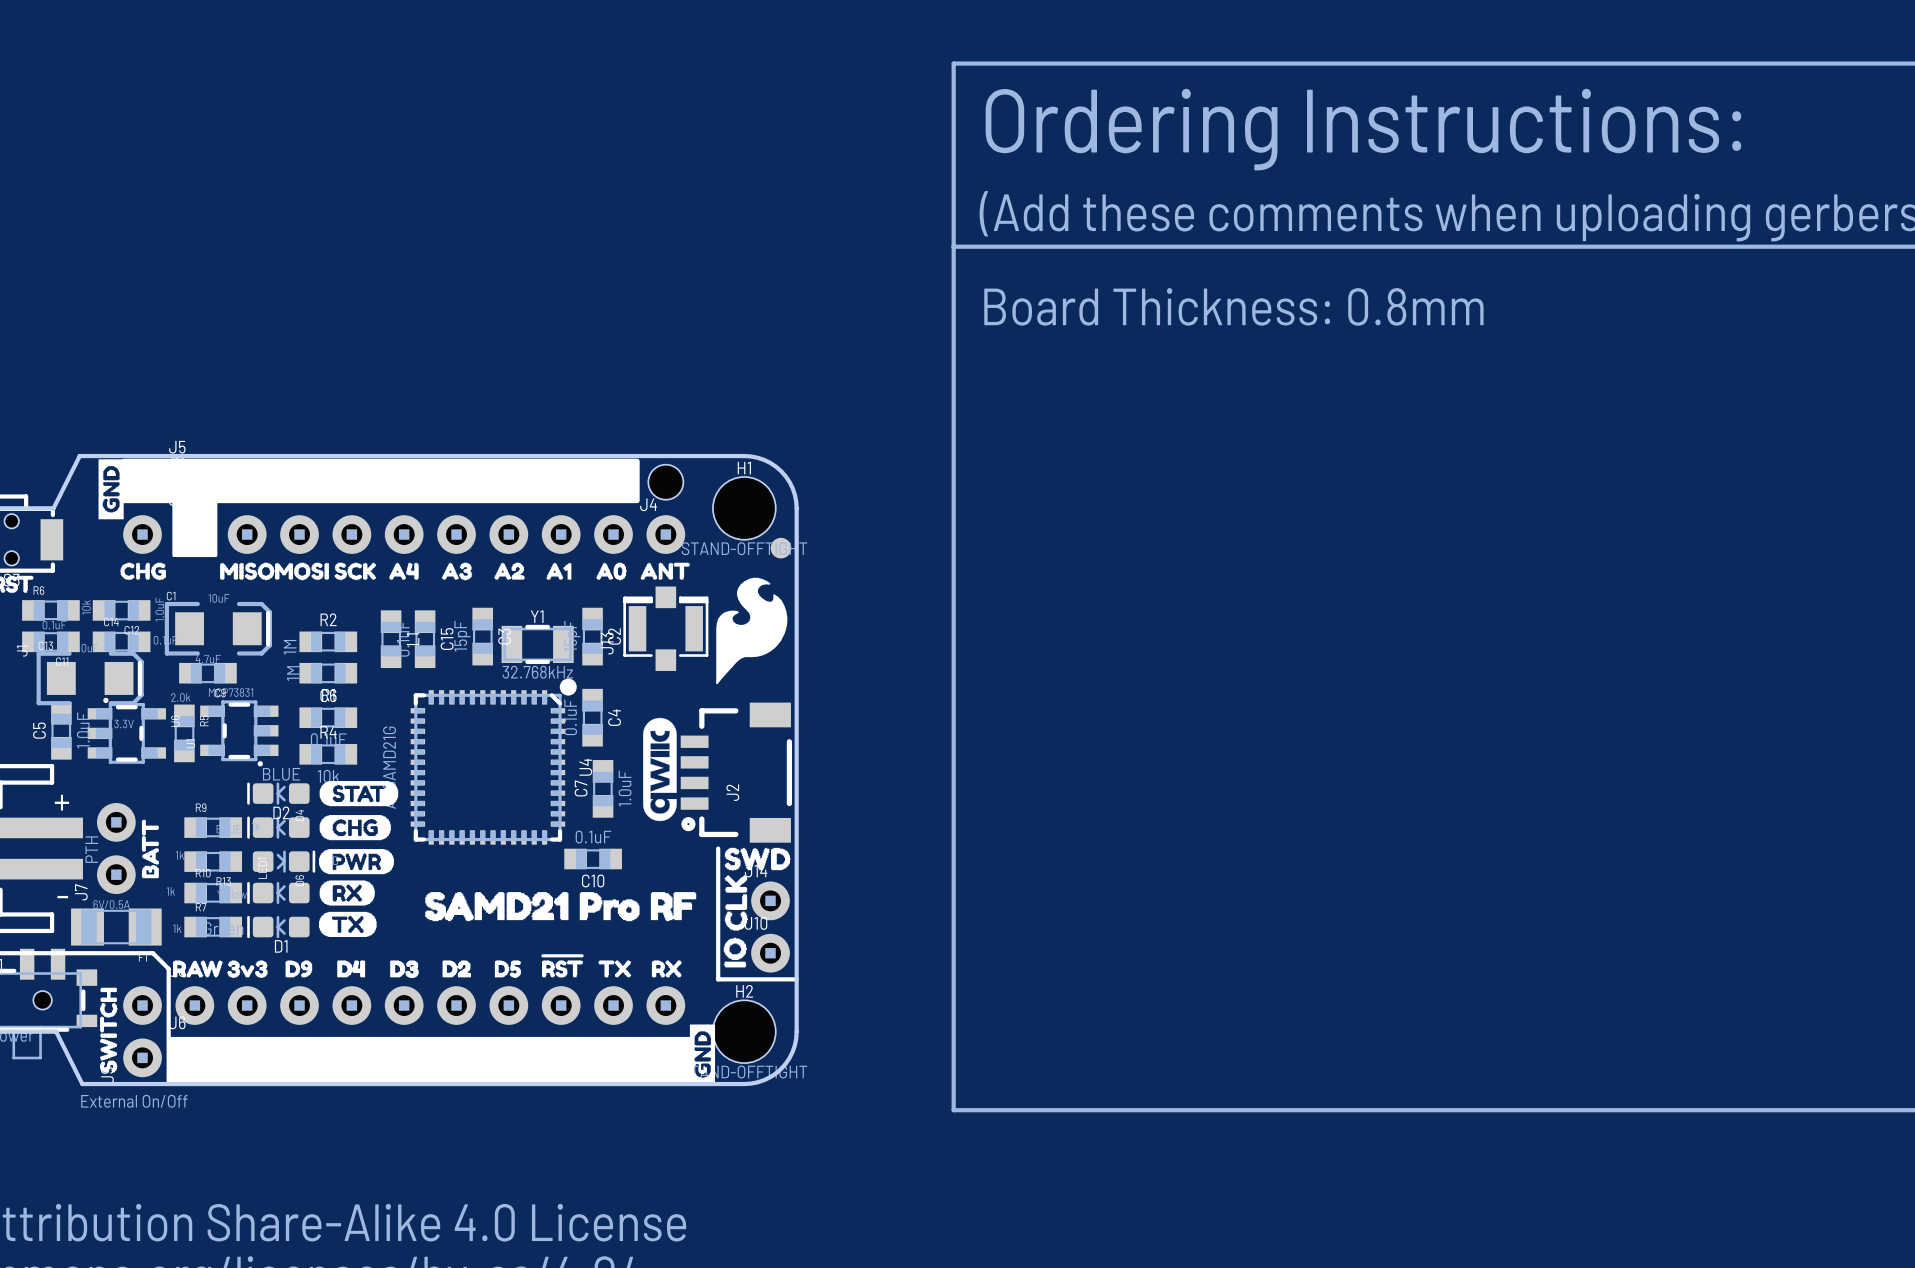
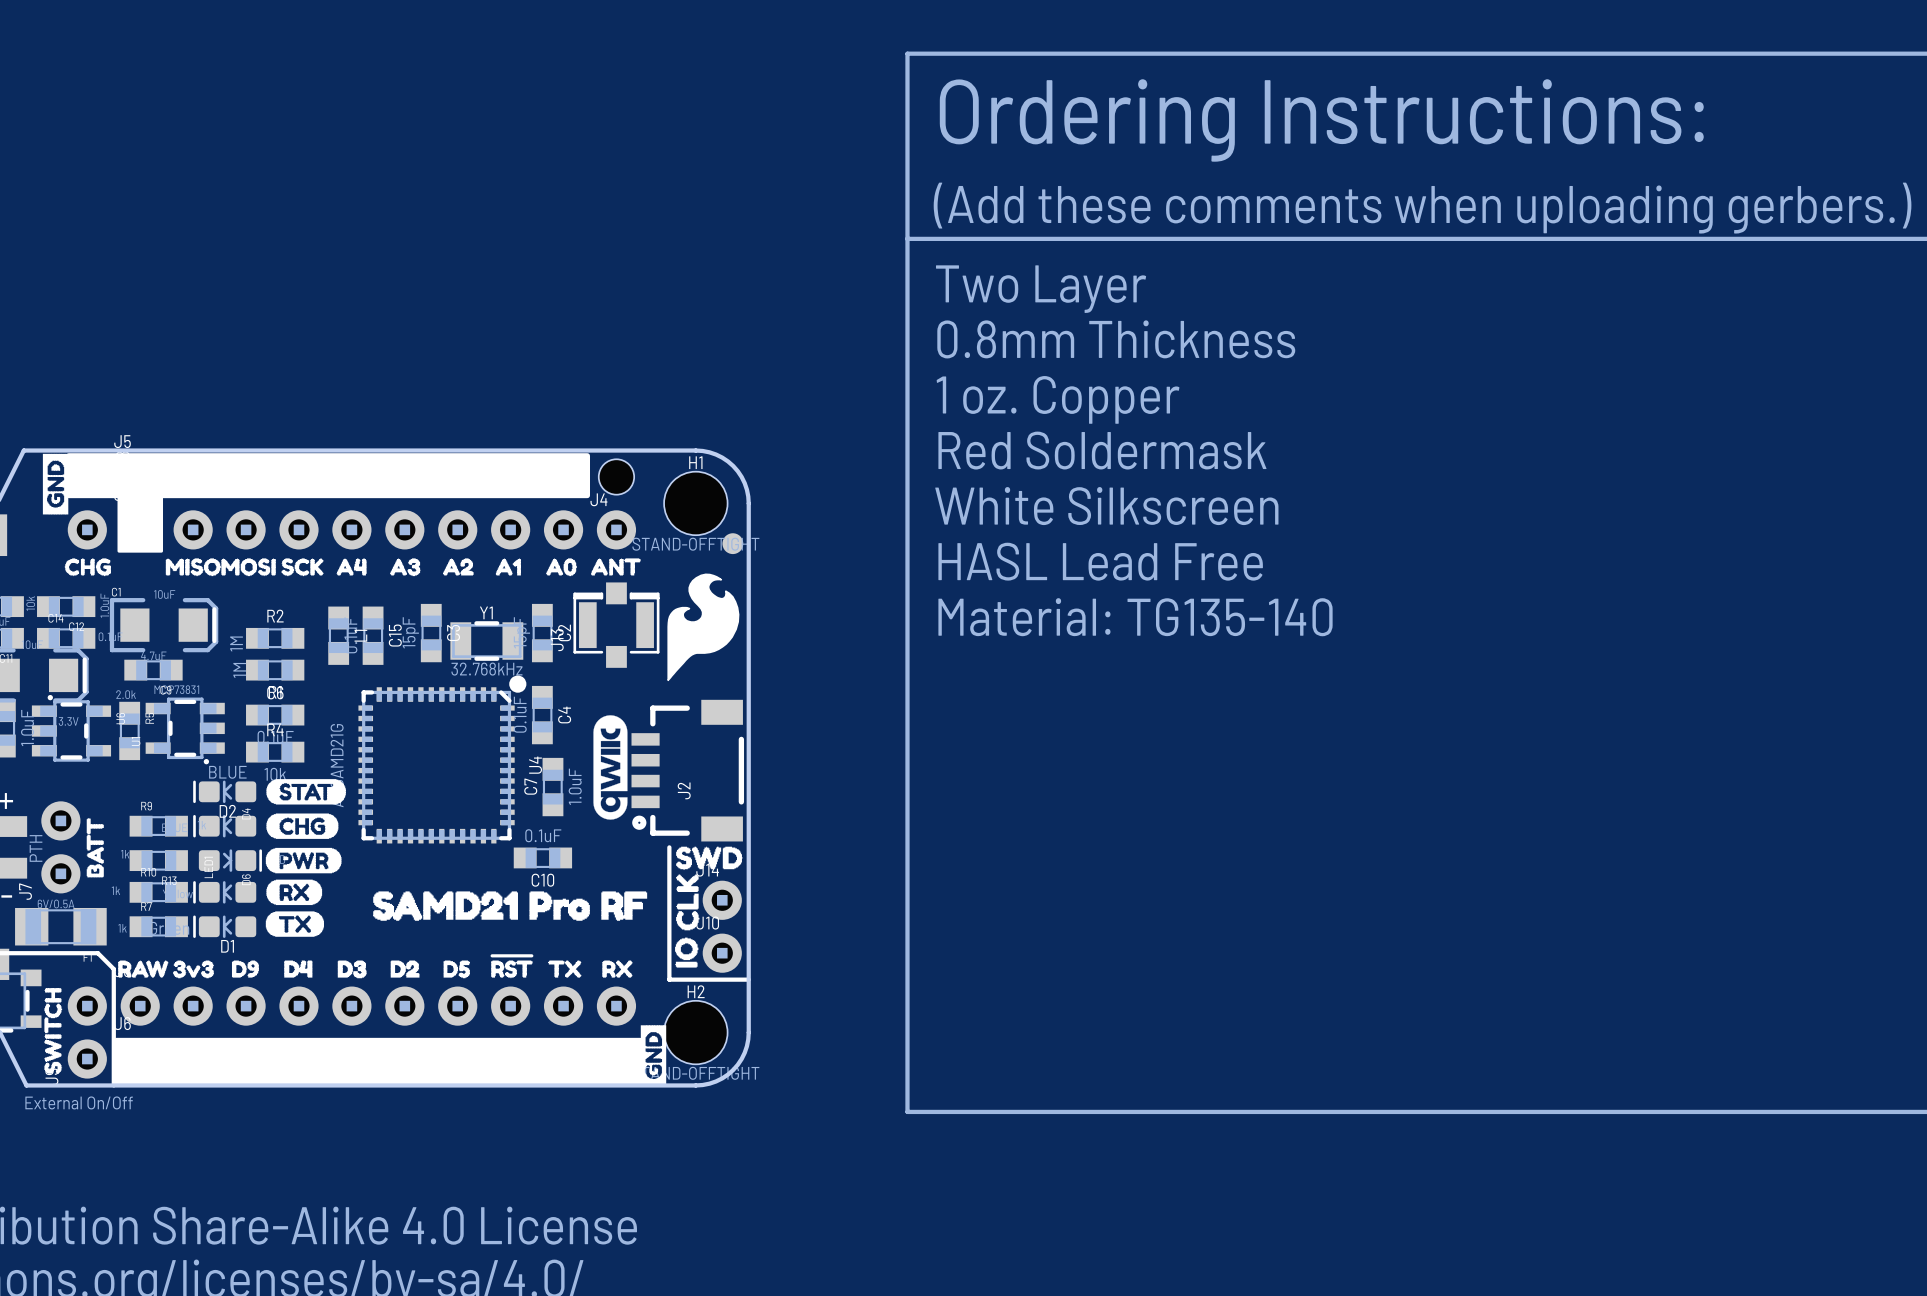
text: Board Thickness: 0.8mm (1233, 306) -> Two Layer (1041, 289)
text: none -> 0.8mm Thickness (1116, 339)
text: none -> 1 oz. Copper (1058, 399)
text: none -> Red Soldermask (1102, 450)
text: none -> White Silkscreen (1106, 506)
text: none -> HASL Lead Free (1100, 561)
text: none -> Material: TG135-140 (1135, 617)

